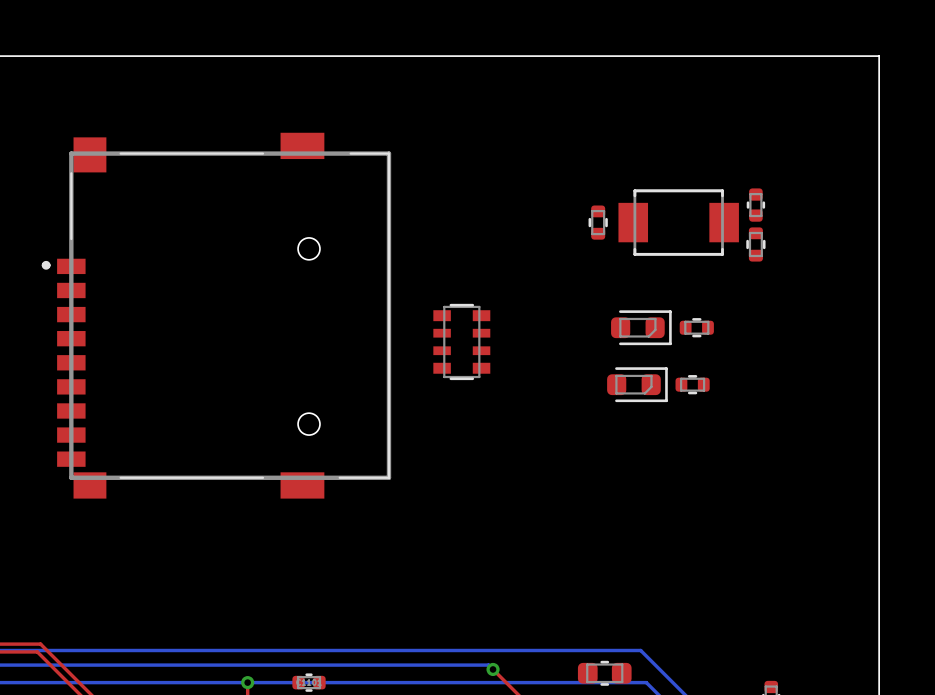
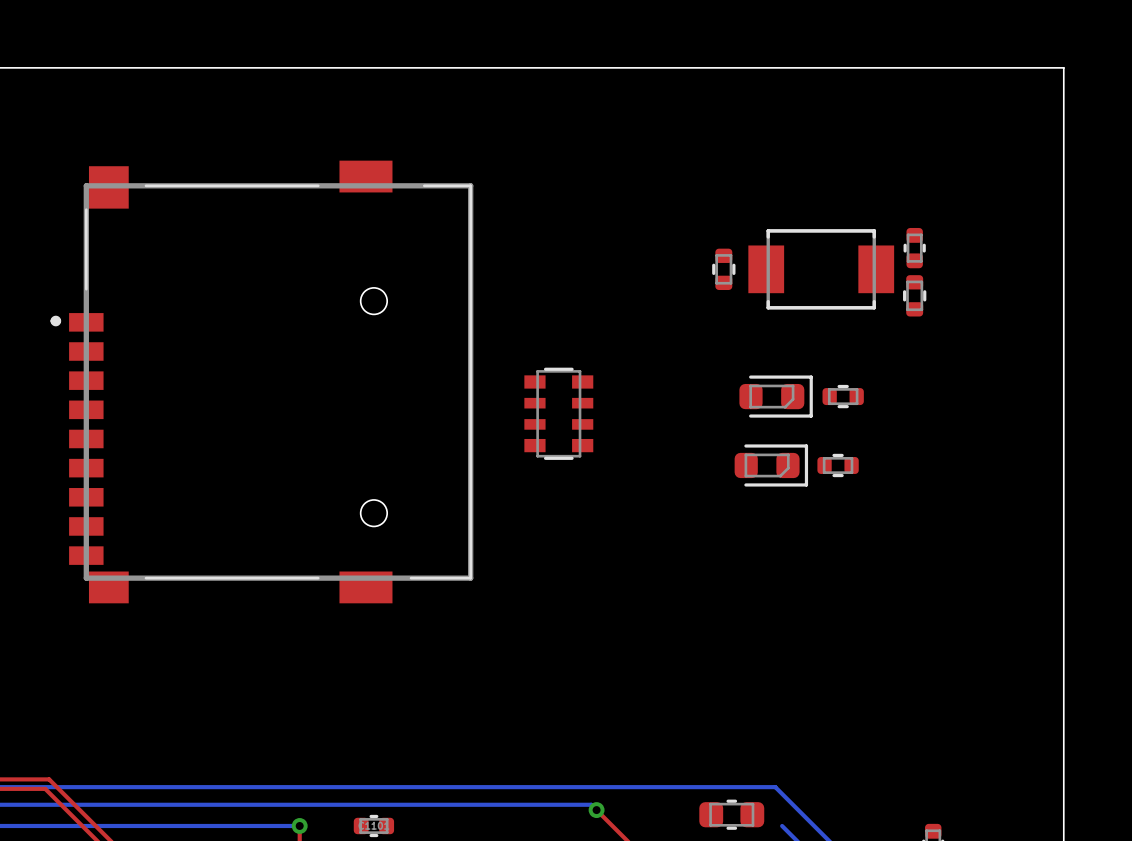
bottom track: (247, 682) (646, 682) -> none

